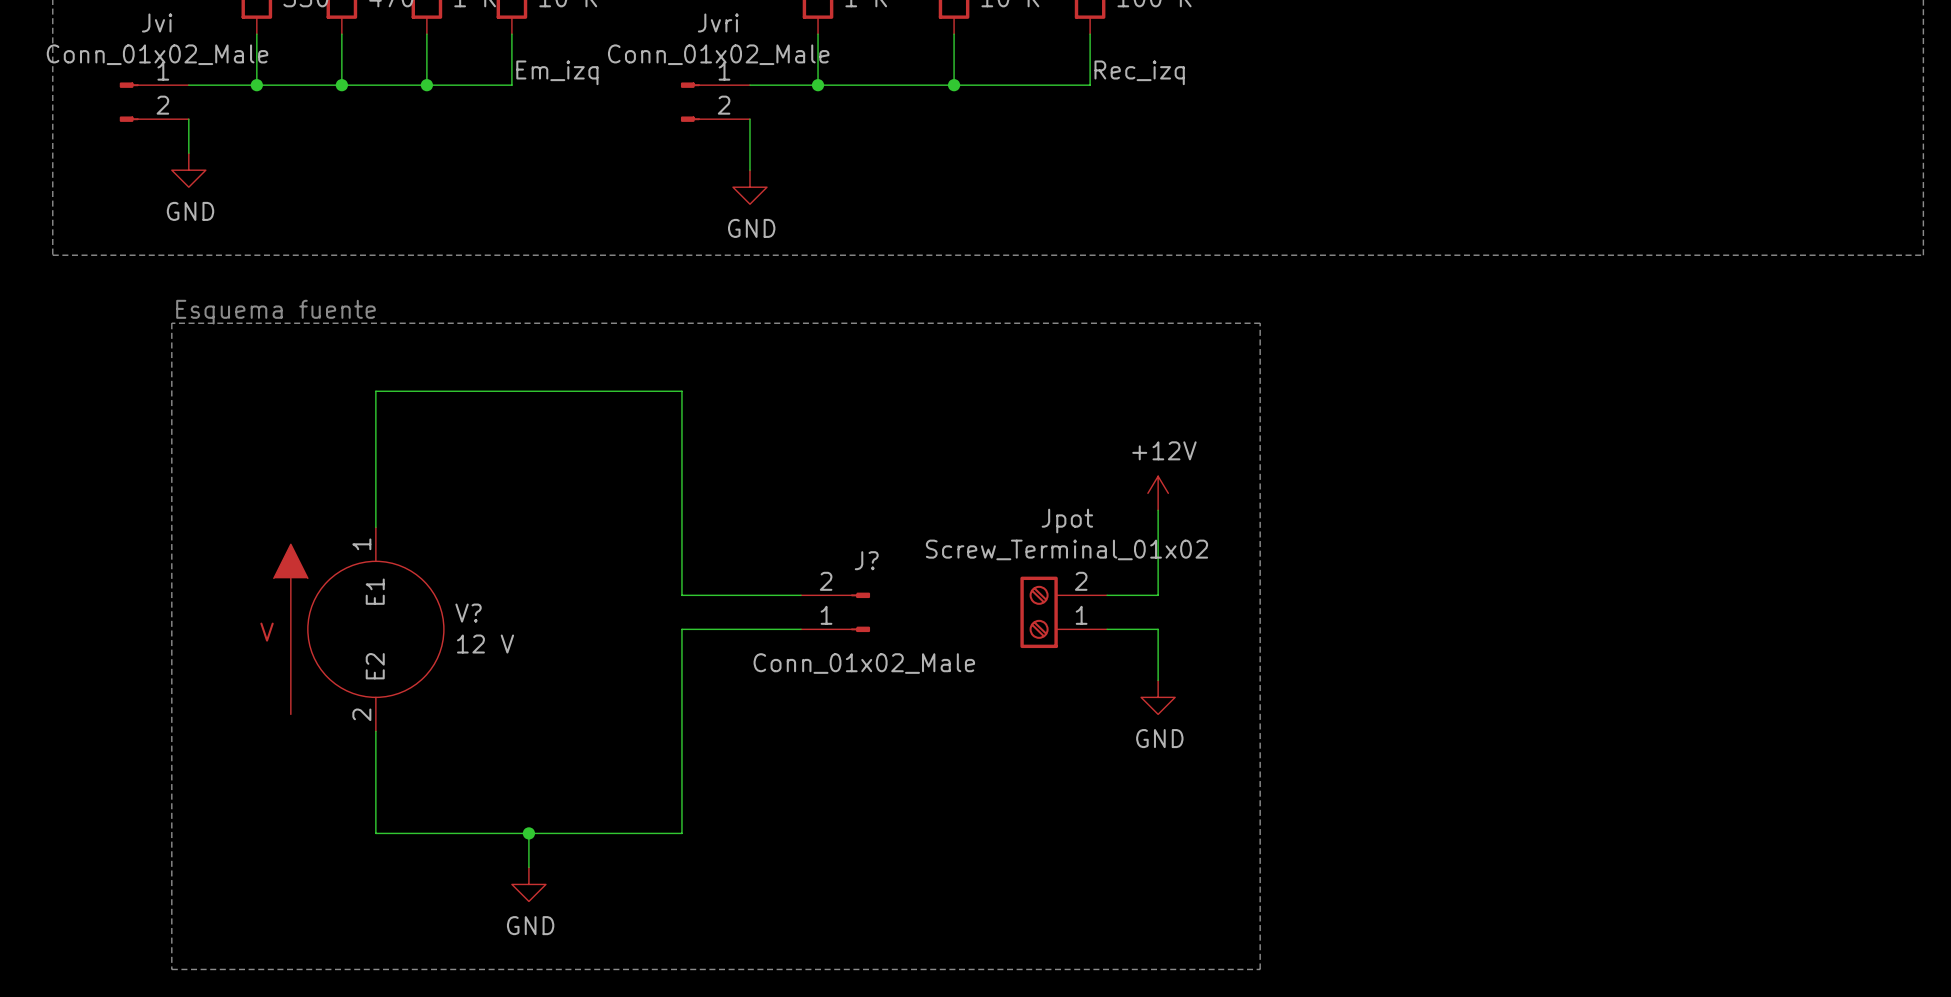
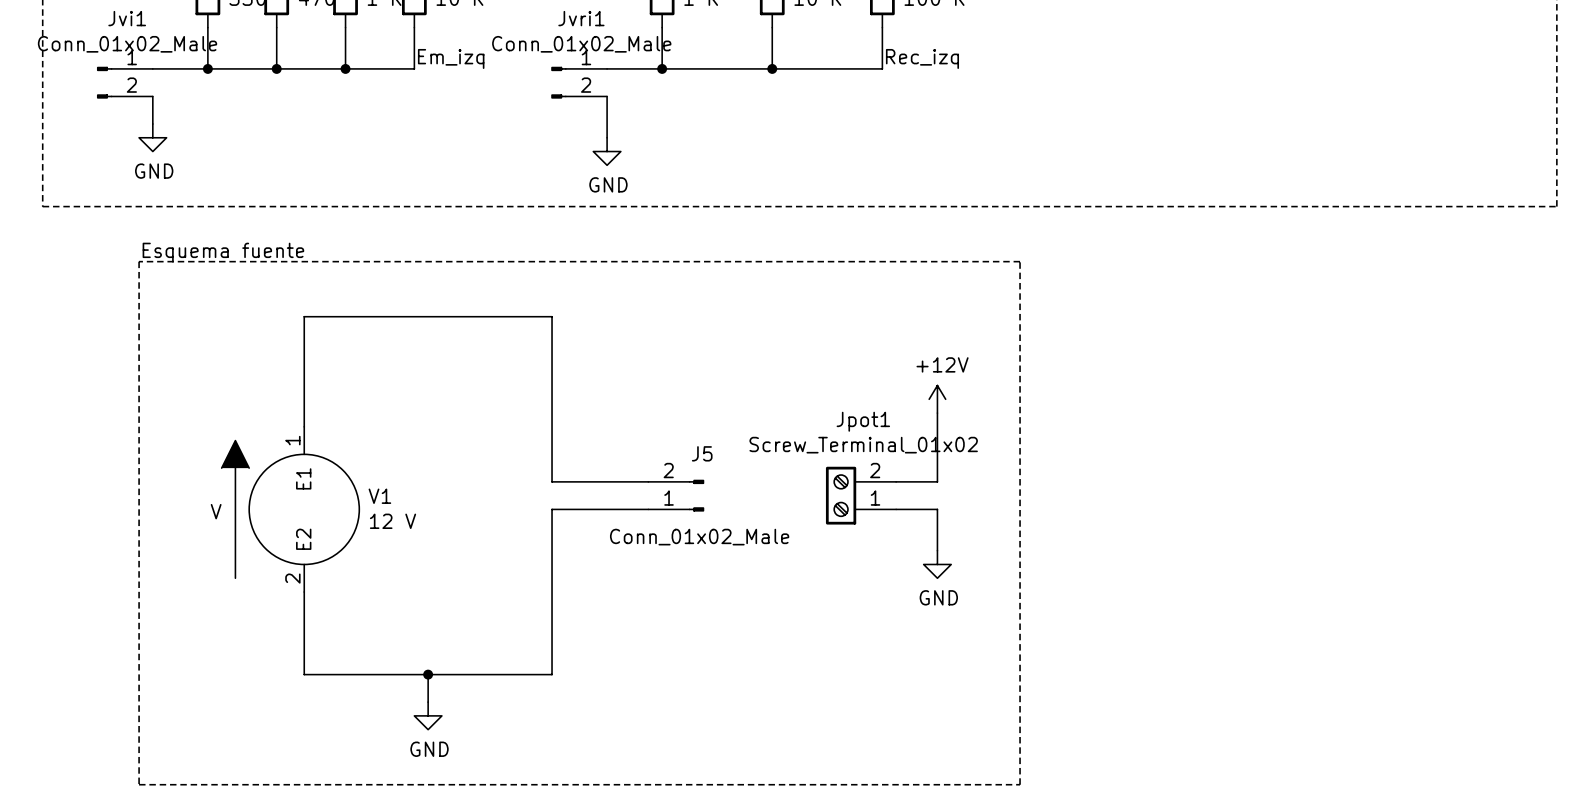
Jvi name: Jvi (157, 22) -> Jvi1 (127, 18)
Jvri name: Jvri (718, 22) -> Jvri1 (581, 18)
Jpot name: Jpot (1067, 521) -> Jpot1 (863, 421)
J? name: J? (866, 560) -> J5 (702, 453)
V? name: V? (468, 613) -> V1 (379, 496)

